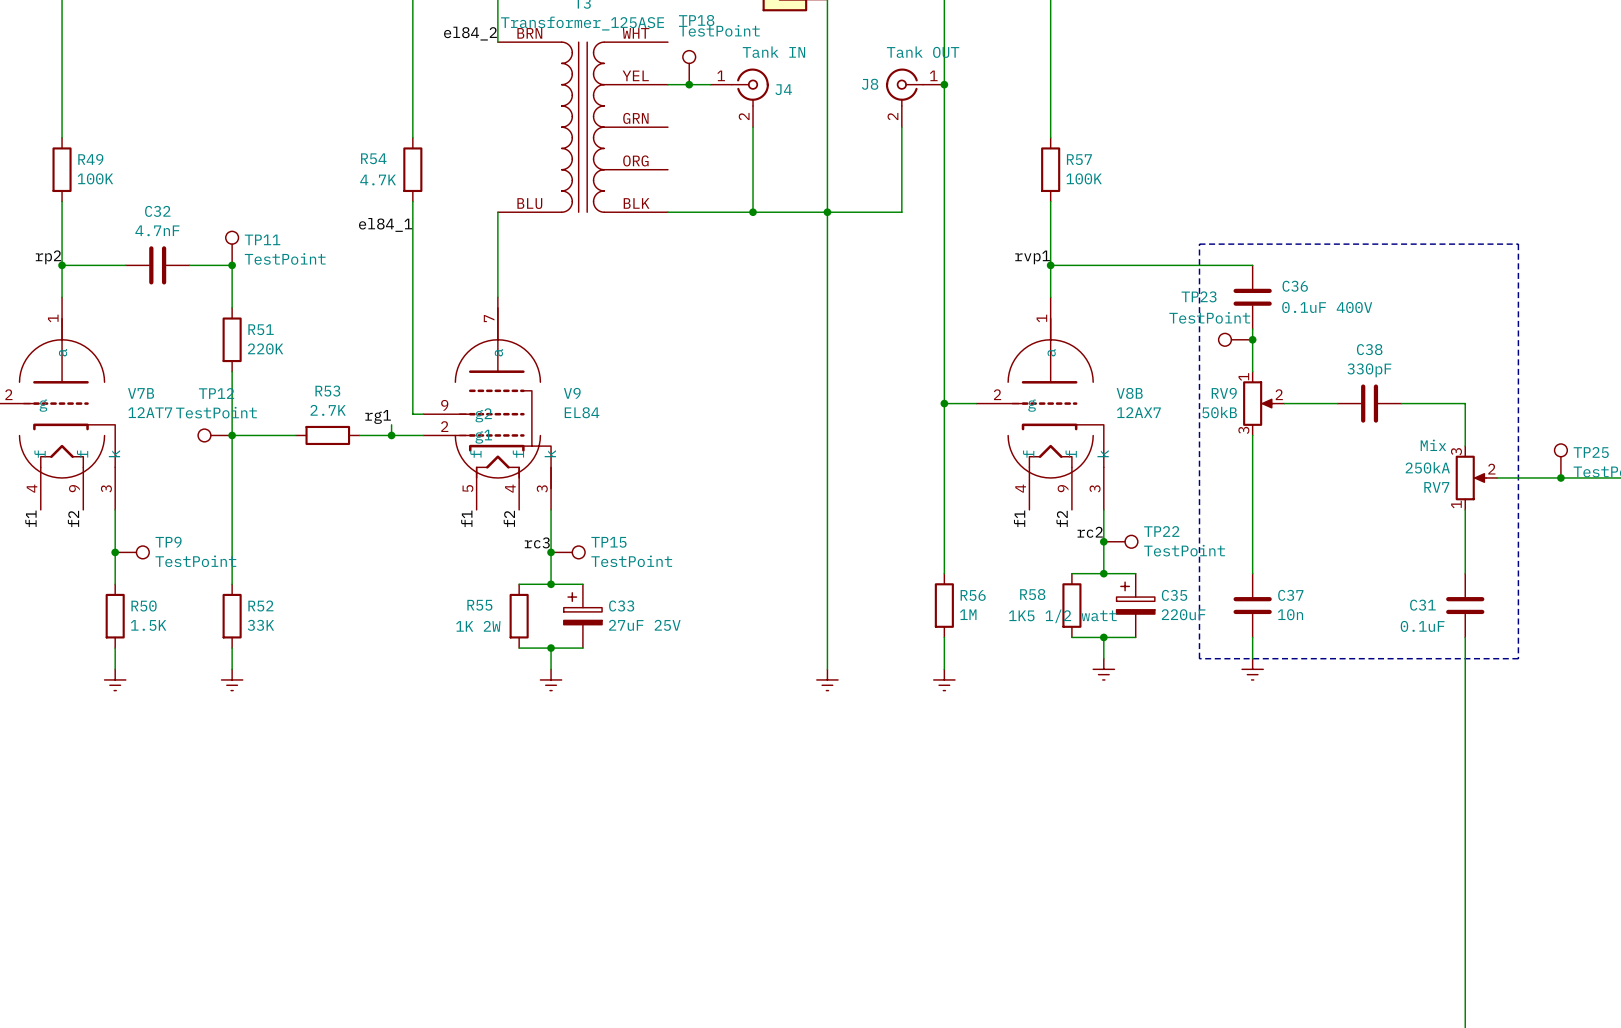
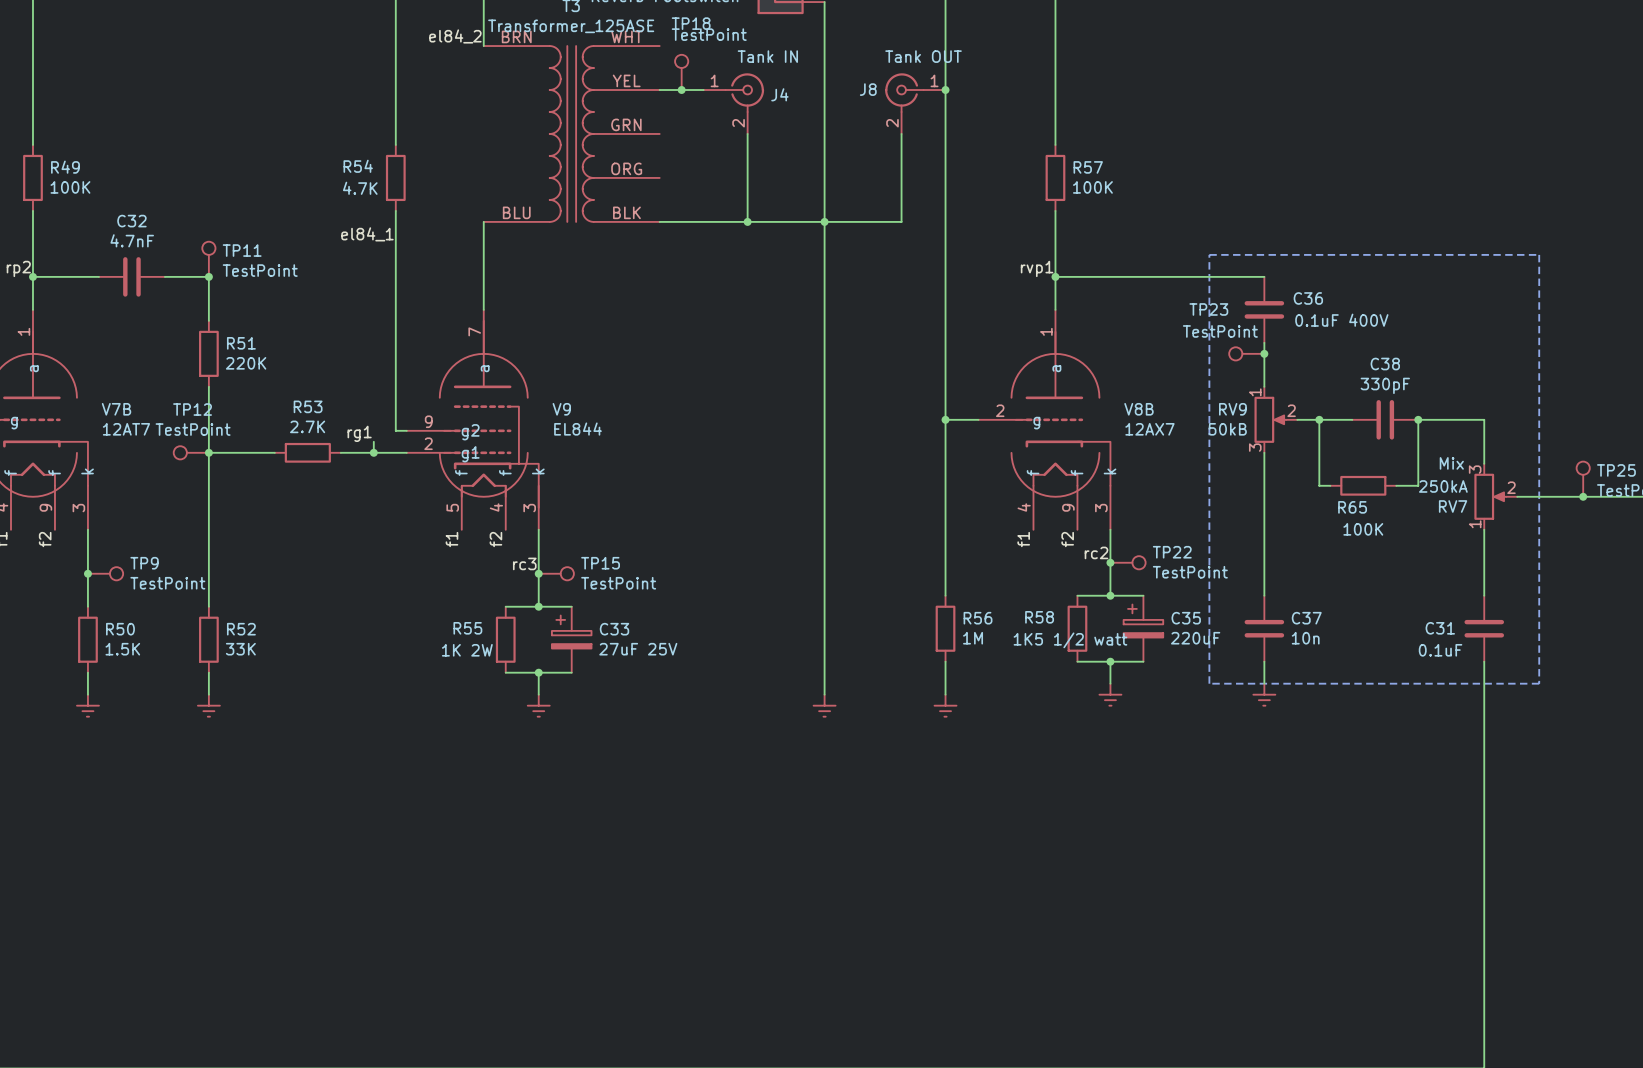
wire: none -> (1319, 419) (1319, 485) (1330, 485)
junction: none -> (1319, 419)
wire: none -> (1418, 419) (1418, 485) (1396, 485)
junction: none -> (1418, 419)
V9 value: EL84 (582, 412) -> EL844 (578, 429)
R65: none -> 100K (1363, 485)

